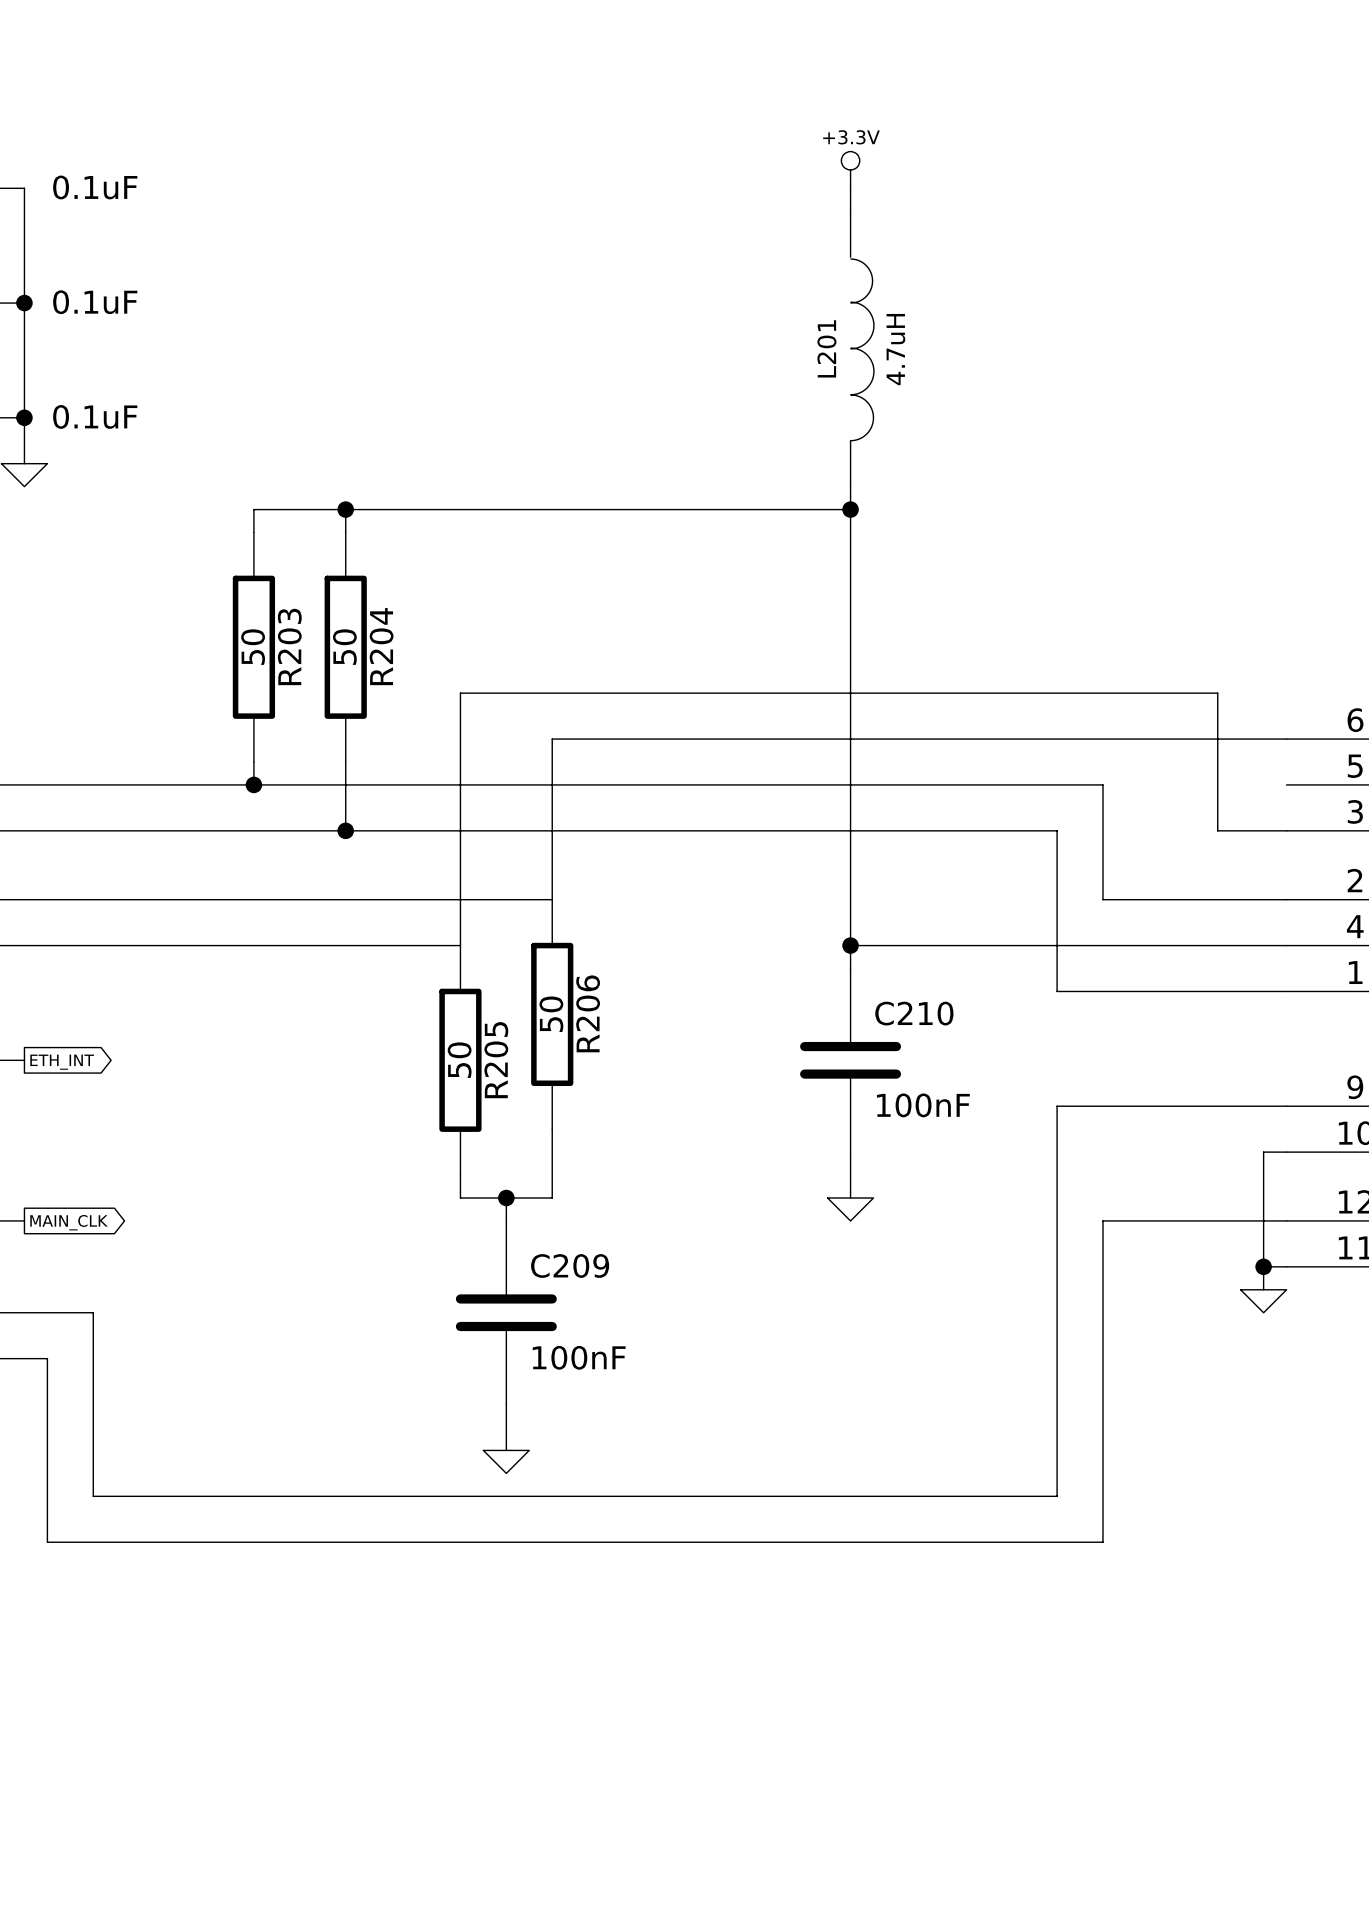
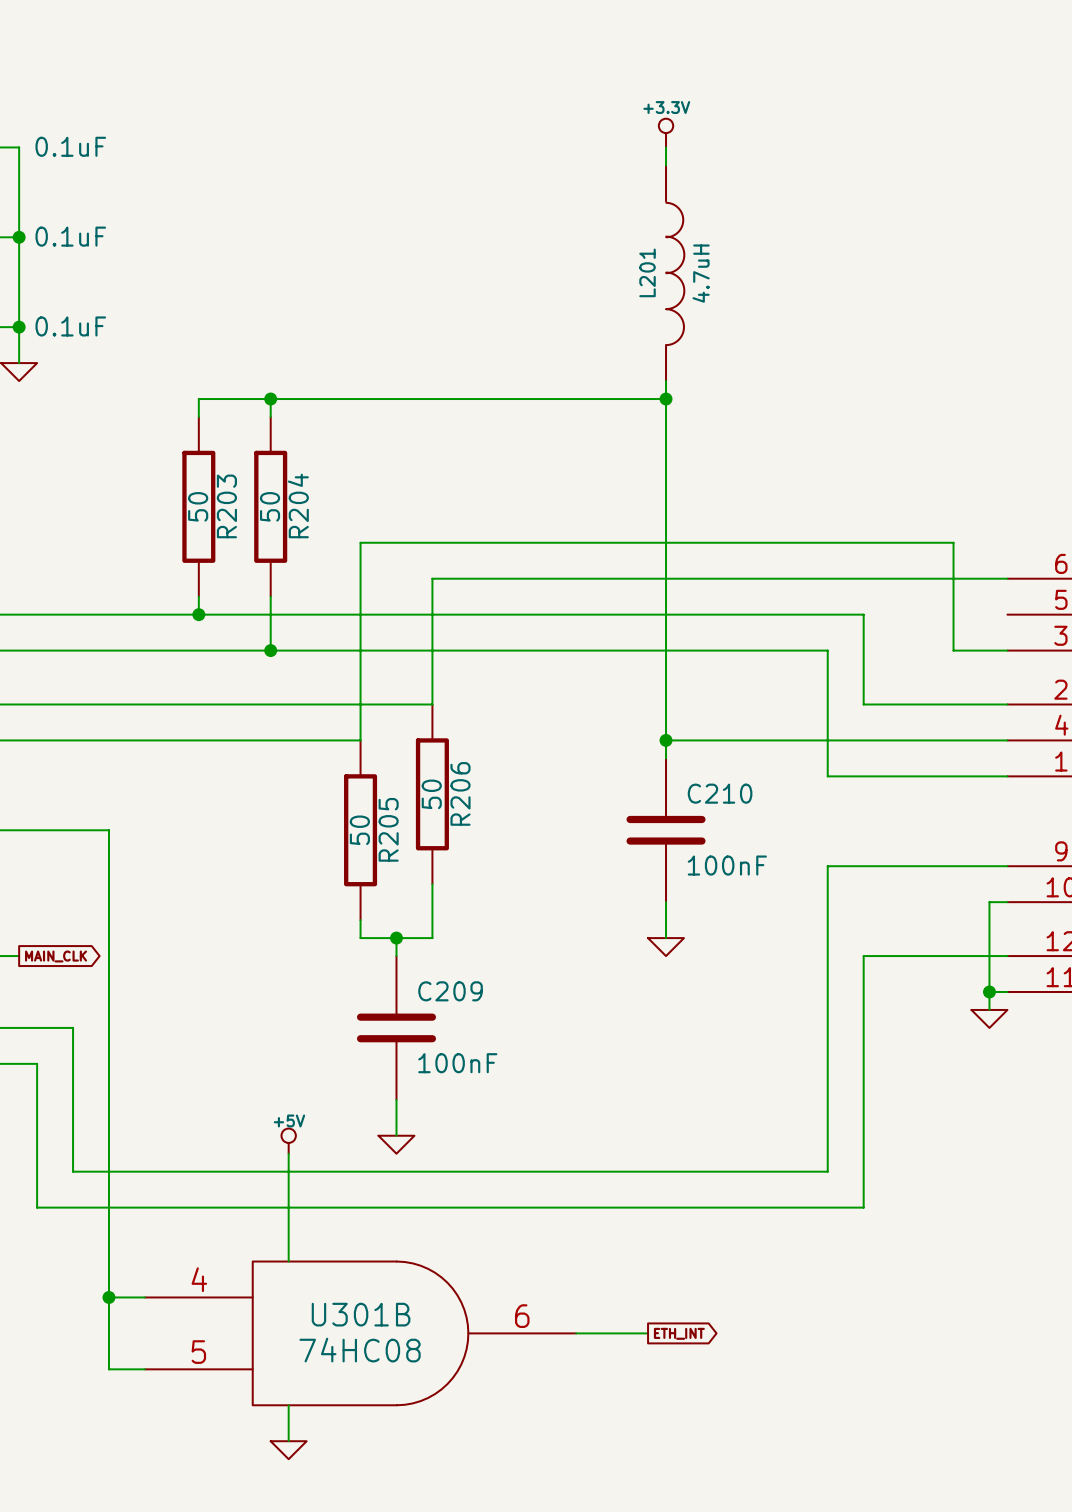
wire: none -> (19, 830) (108, 830) (108, 1369) (144, 1369)
global label: ETH_INT (62, 1062) -> none
power symbol: none -> +5V (288, 1141)
wire: none -> (288, 1153) (288, 1261)
wire: none -> (108, 1297) (144, 1297)
junction: none -> (108, 1297)
U301B: none -> 74HC08 (360, 1333)
wire: none -> (576, 1333) (648, 1333)
global label: none -> ETH_INT (679, 1333)
wire: none -> (288, 1405) (288, 1441)
power symbol: none -> (288, 1450)

